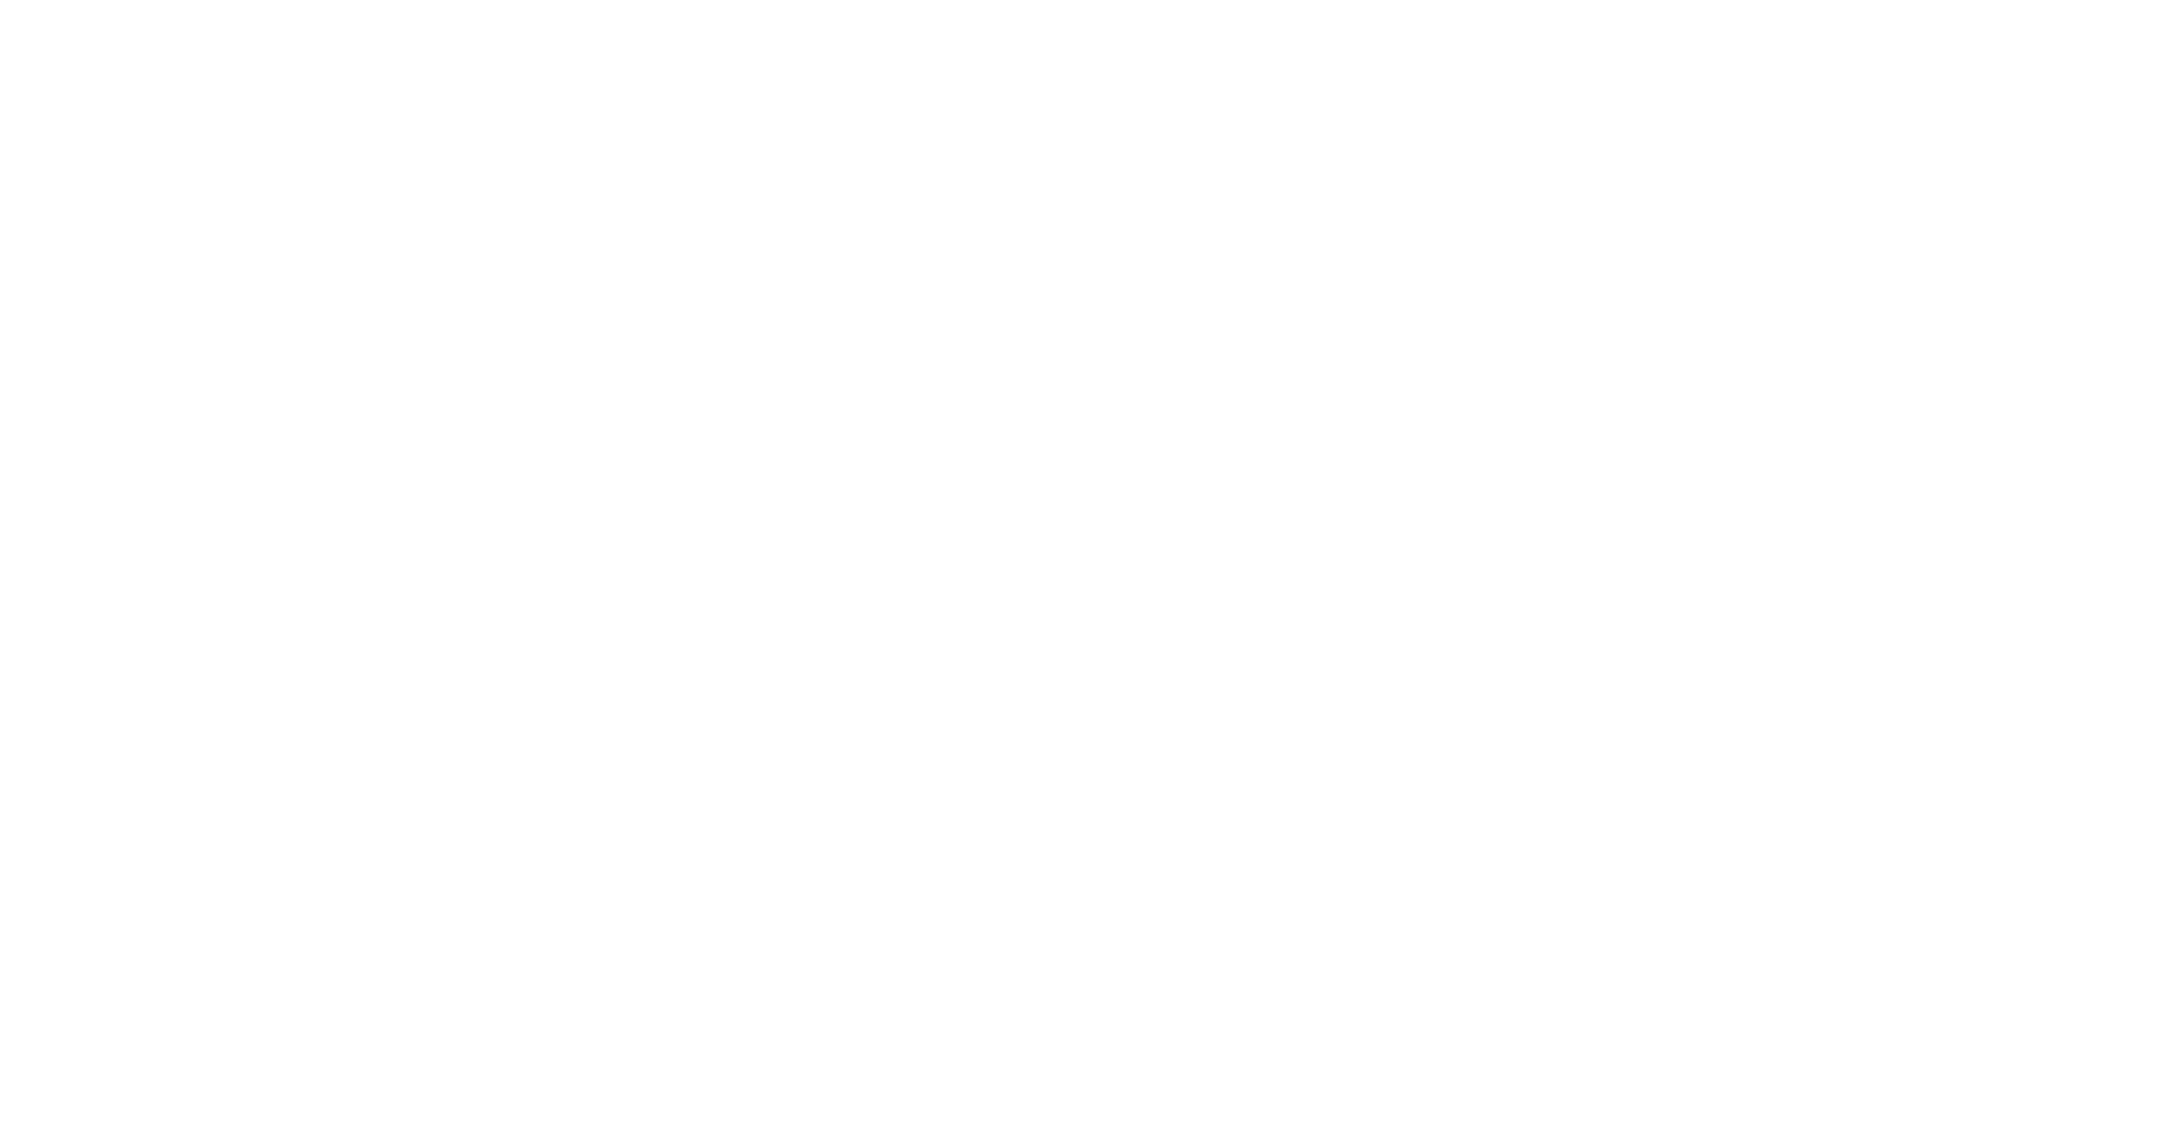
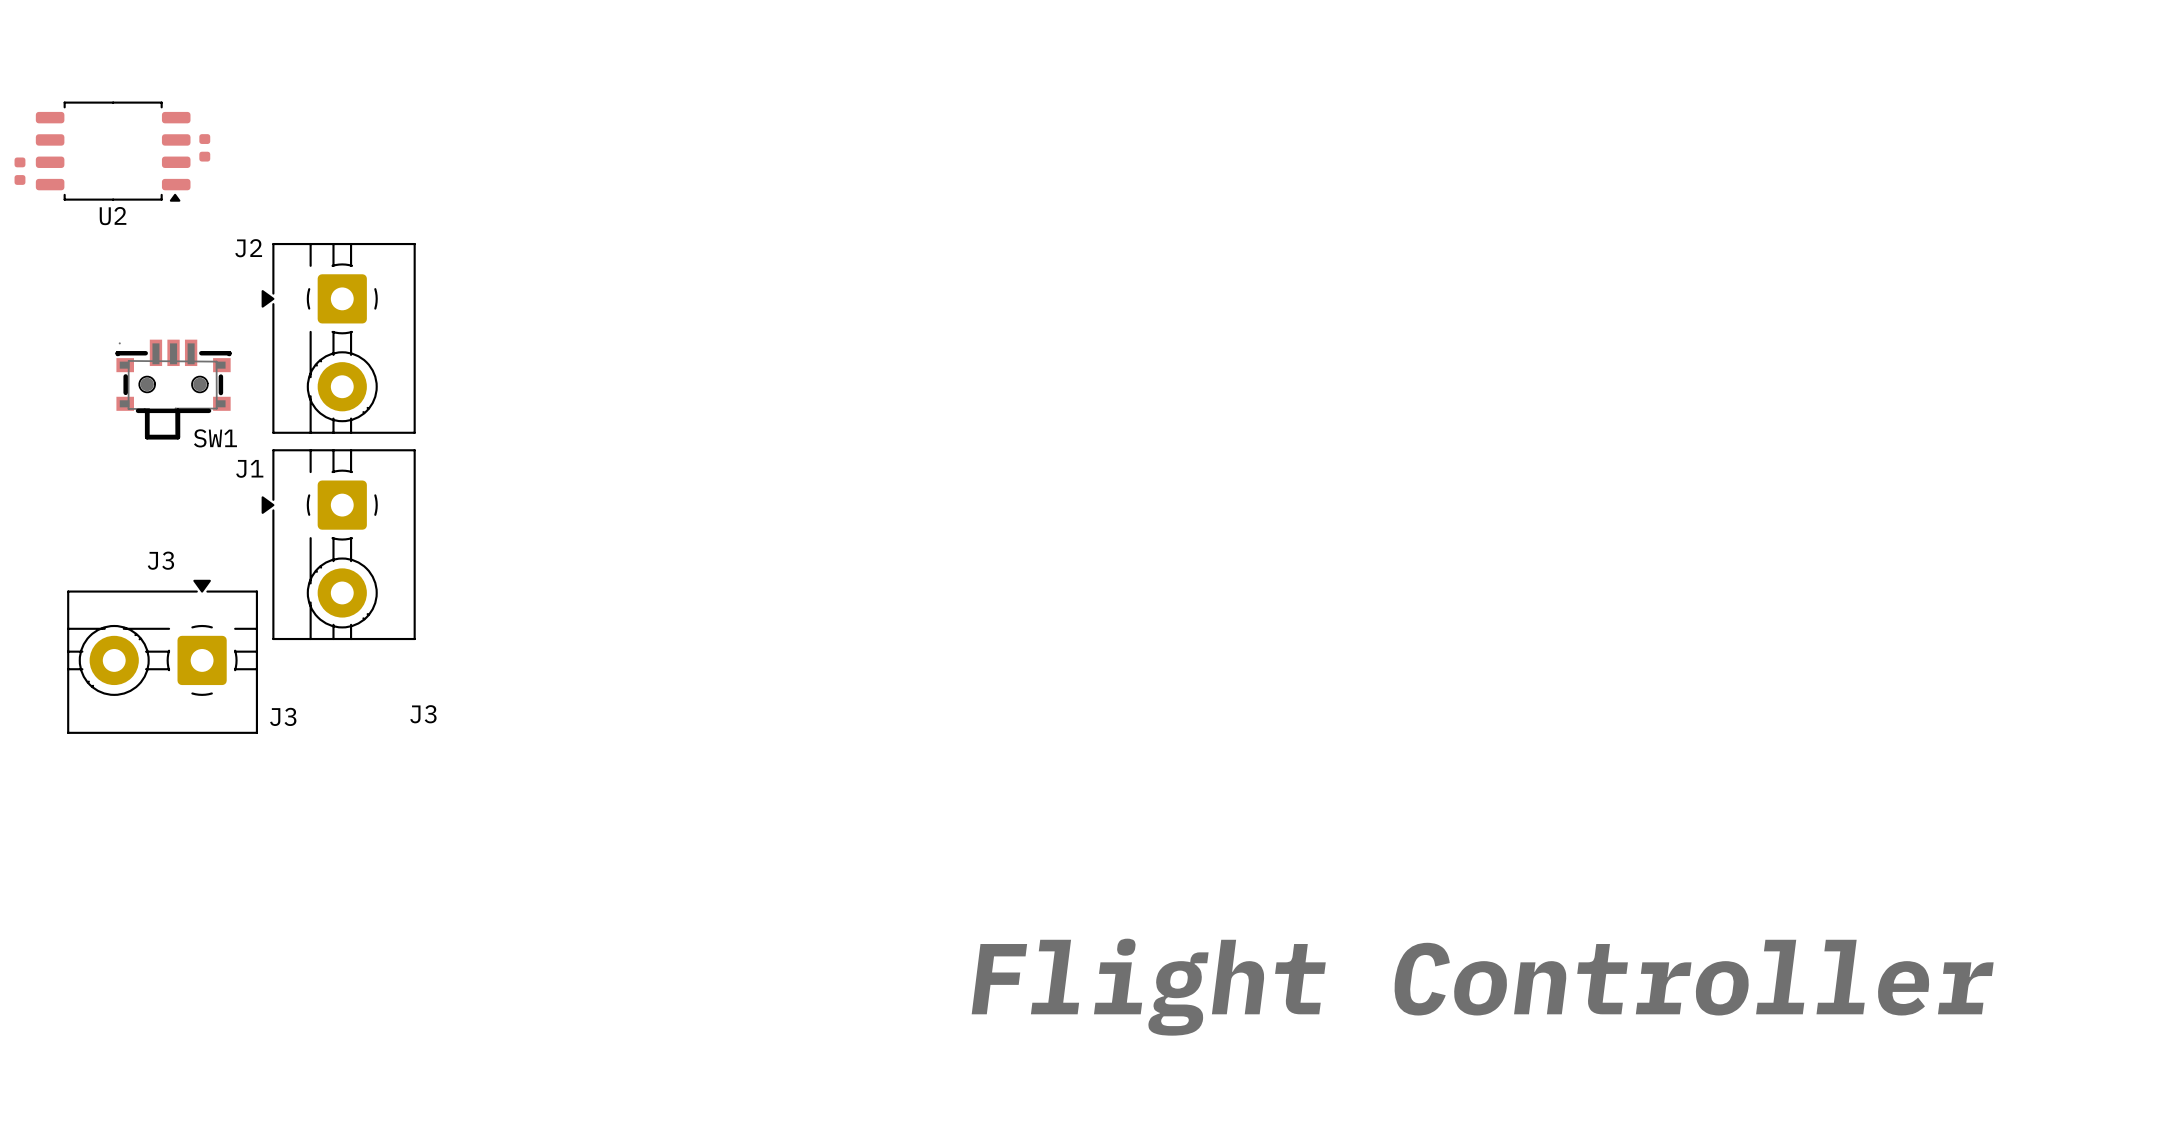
part: none -> (204, 147)
U2: none -> (113, 151)
part: none -> (19, 171)
J2: none -> (338, 338)
SW1: none -> (173, 389)
J1: none -> (338, 544)
J3: none -> (162, 656)
text: none -> J3 (423, 714)
text: none -> J3 (283, 716)
text: none -> Flight Controller (1482, 987)

